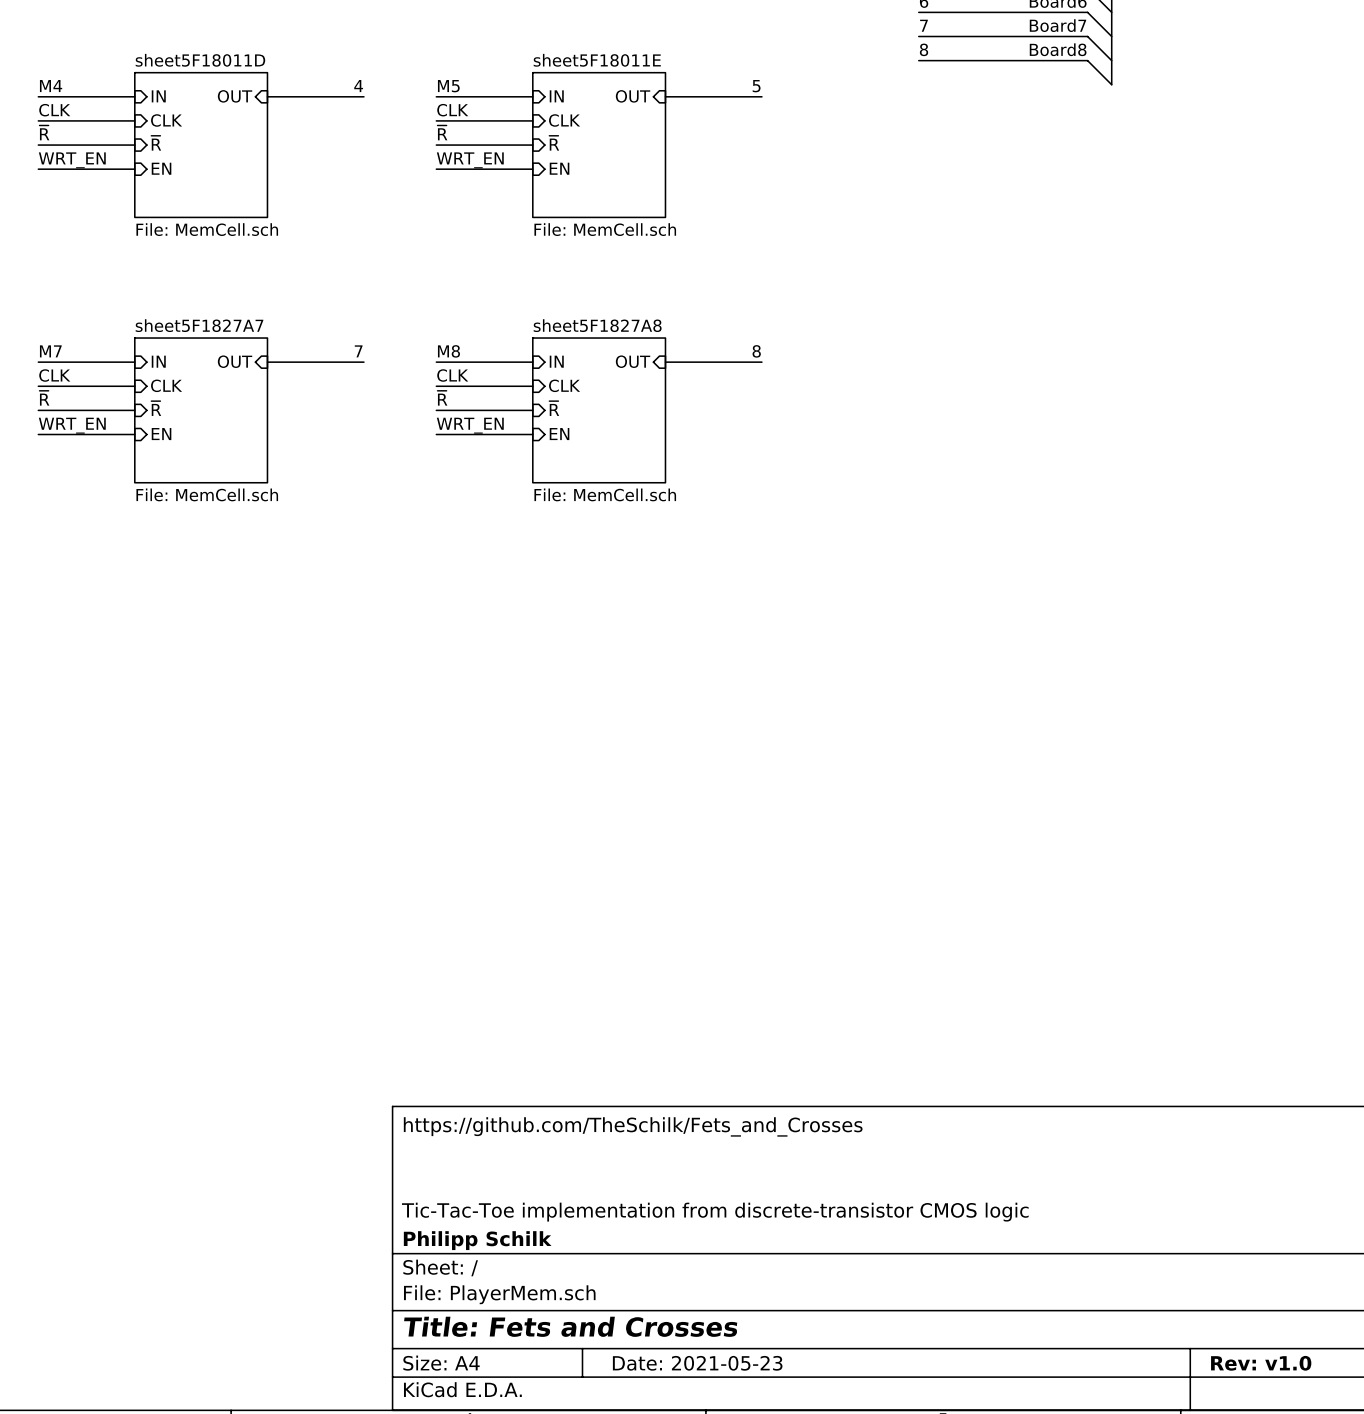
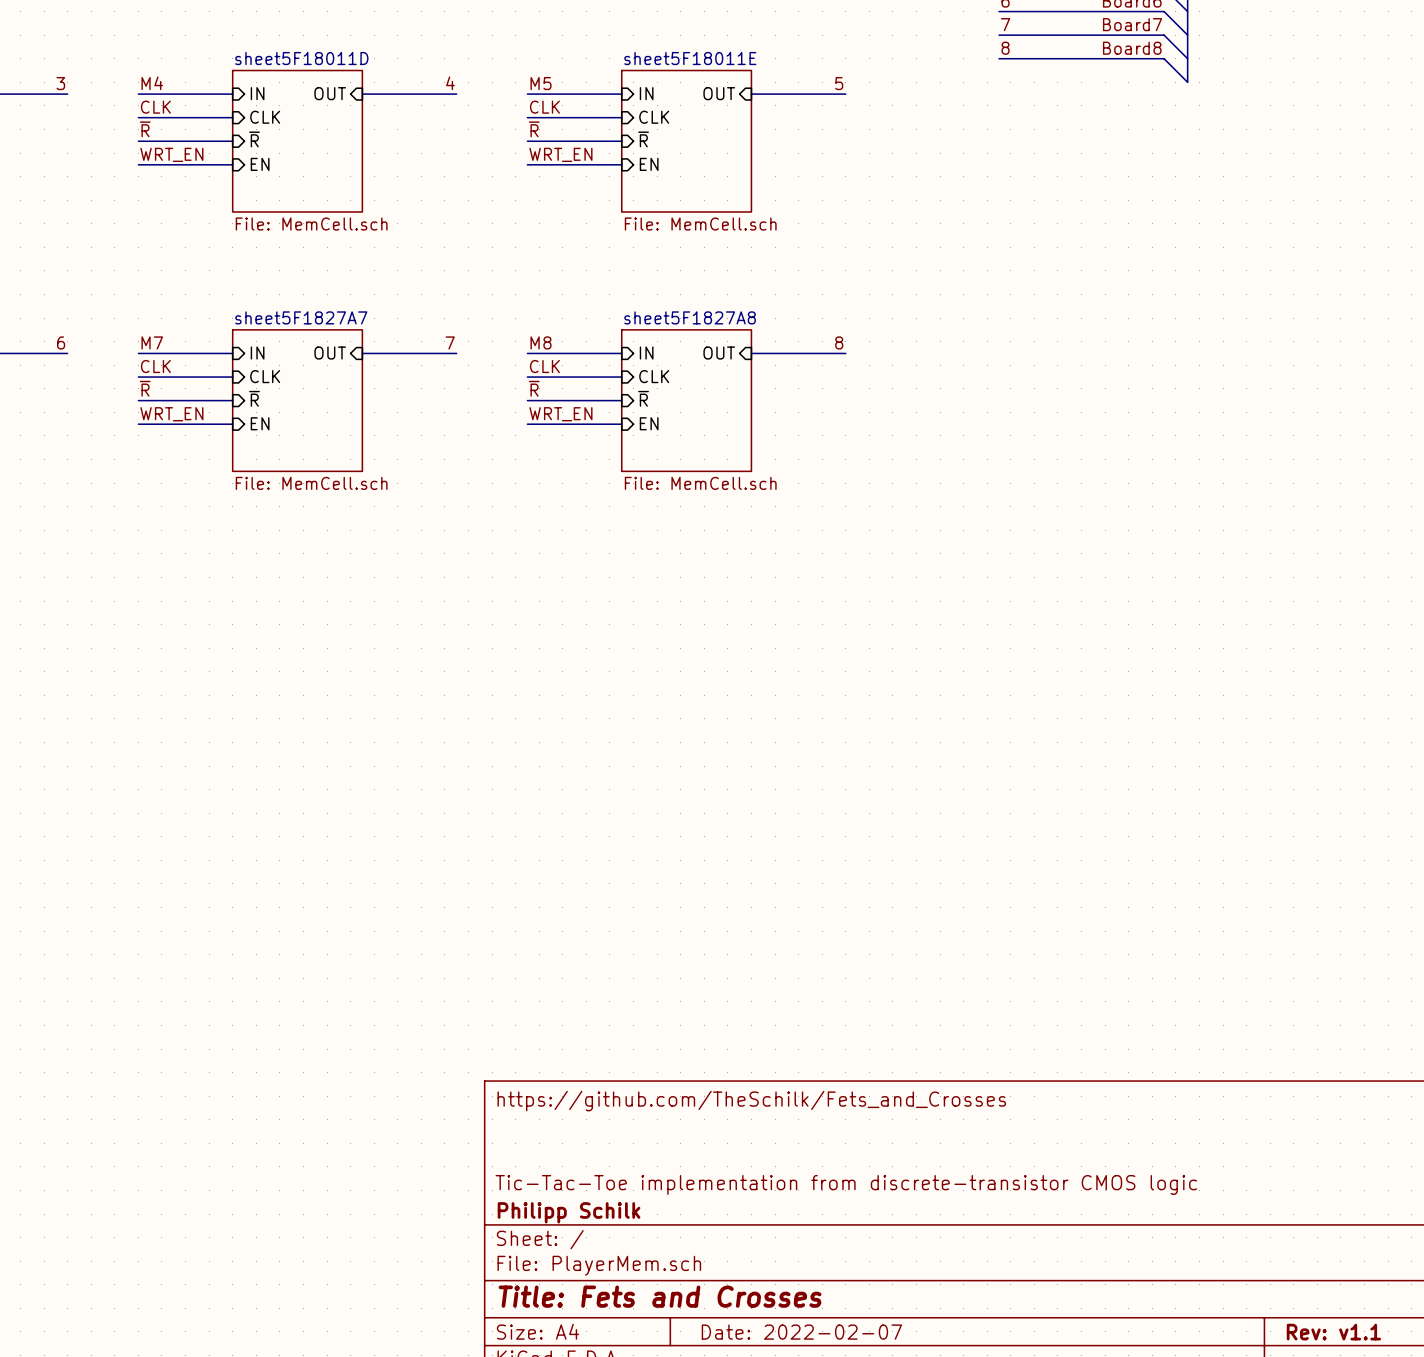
title block: Date: 2021-05-23 (697, 1363) -> Date: 2022-02-07 (801, 1332)
title block: Rev: v1.0 (1261, 1363) -> Rev: v1.1 (1333, 1332)

